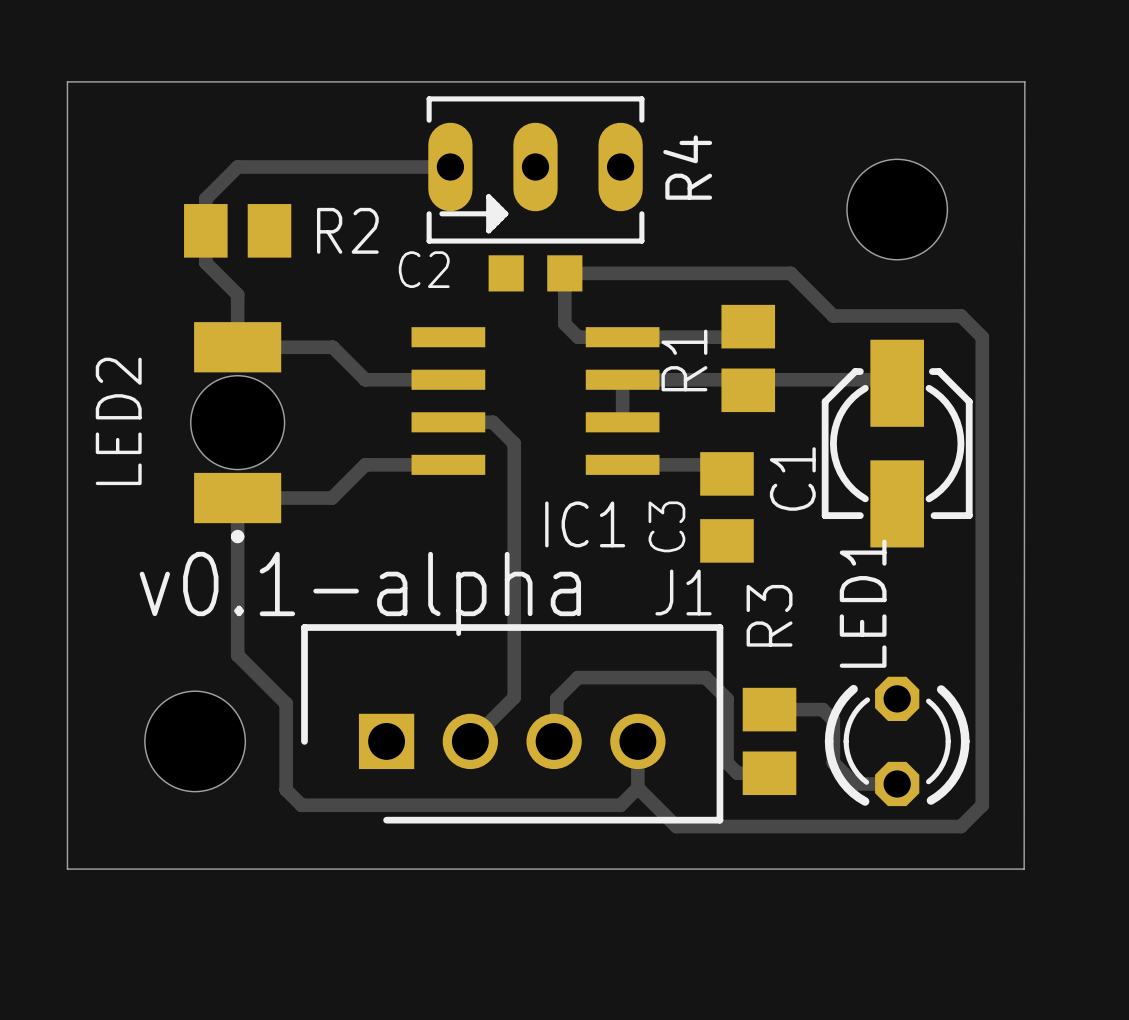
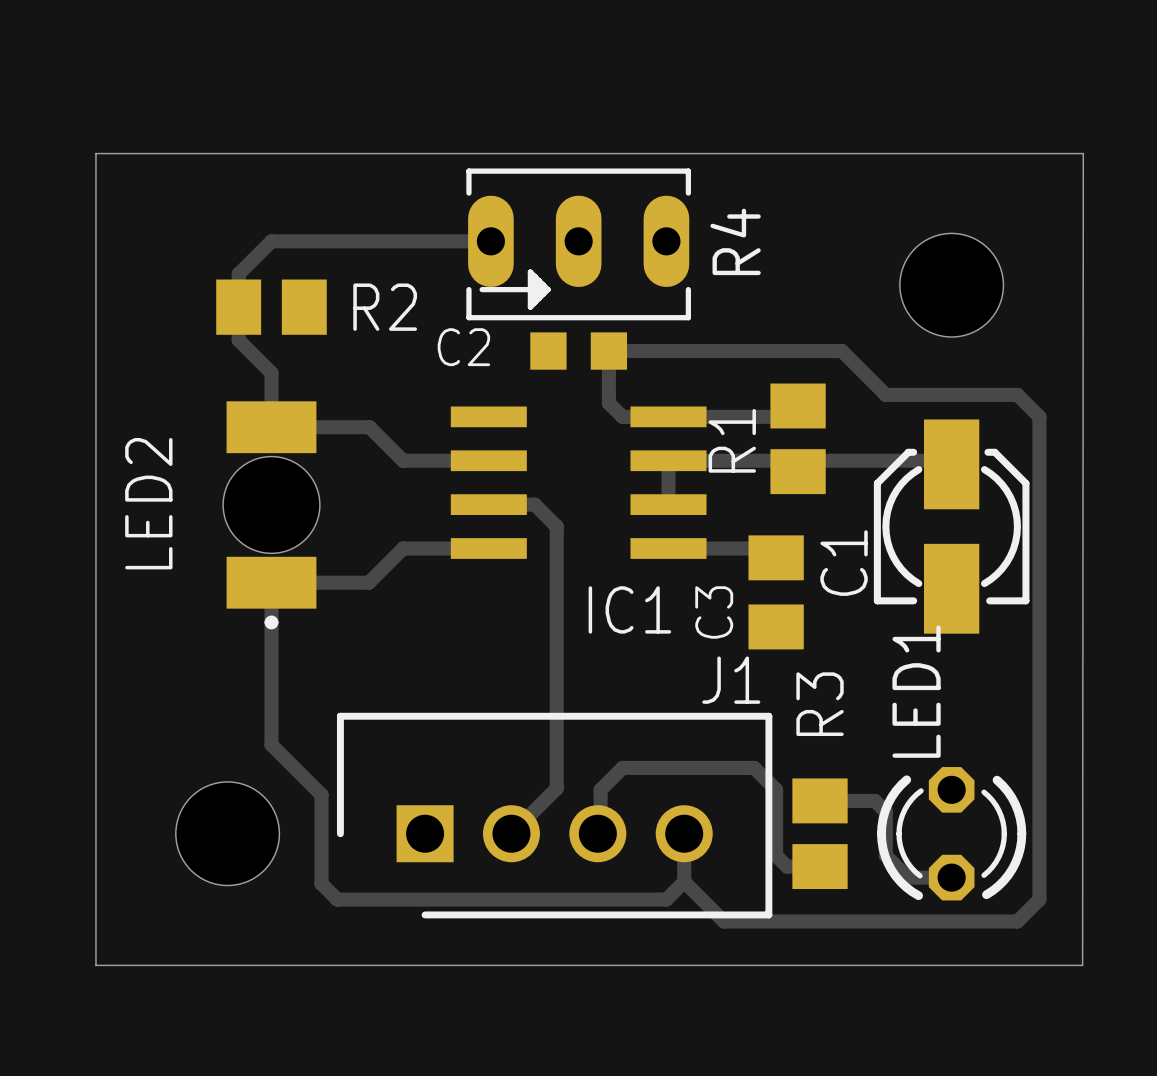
text: v0.1-alpha (360, 593) -> none

